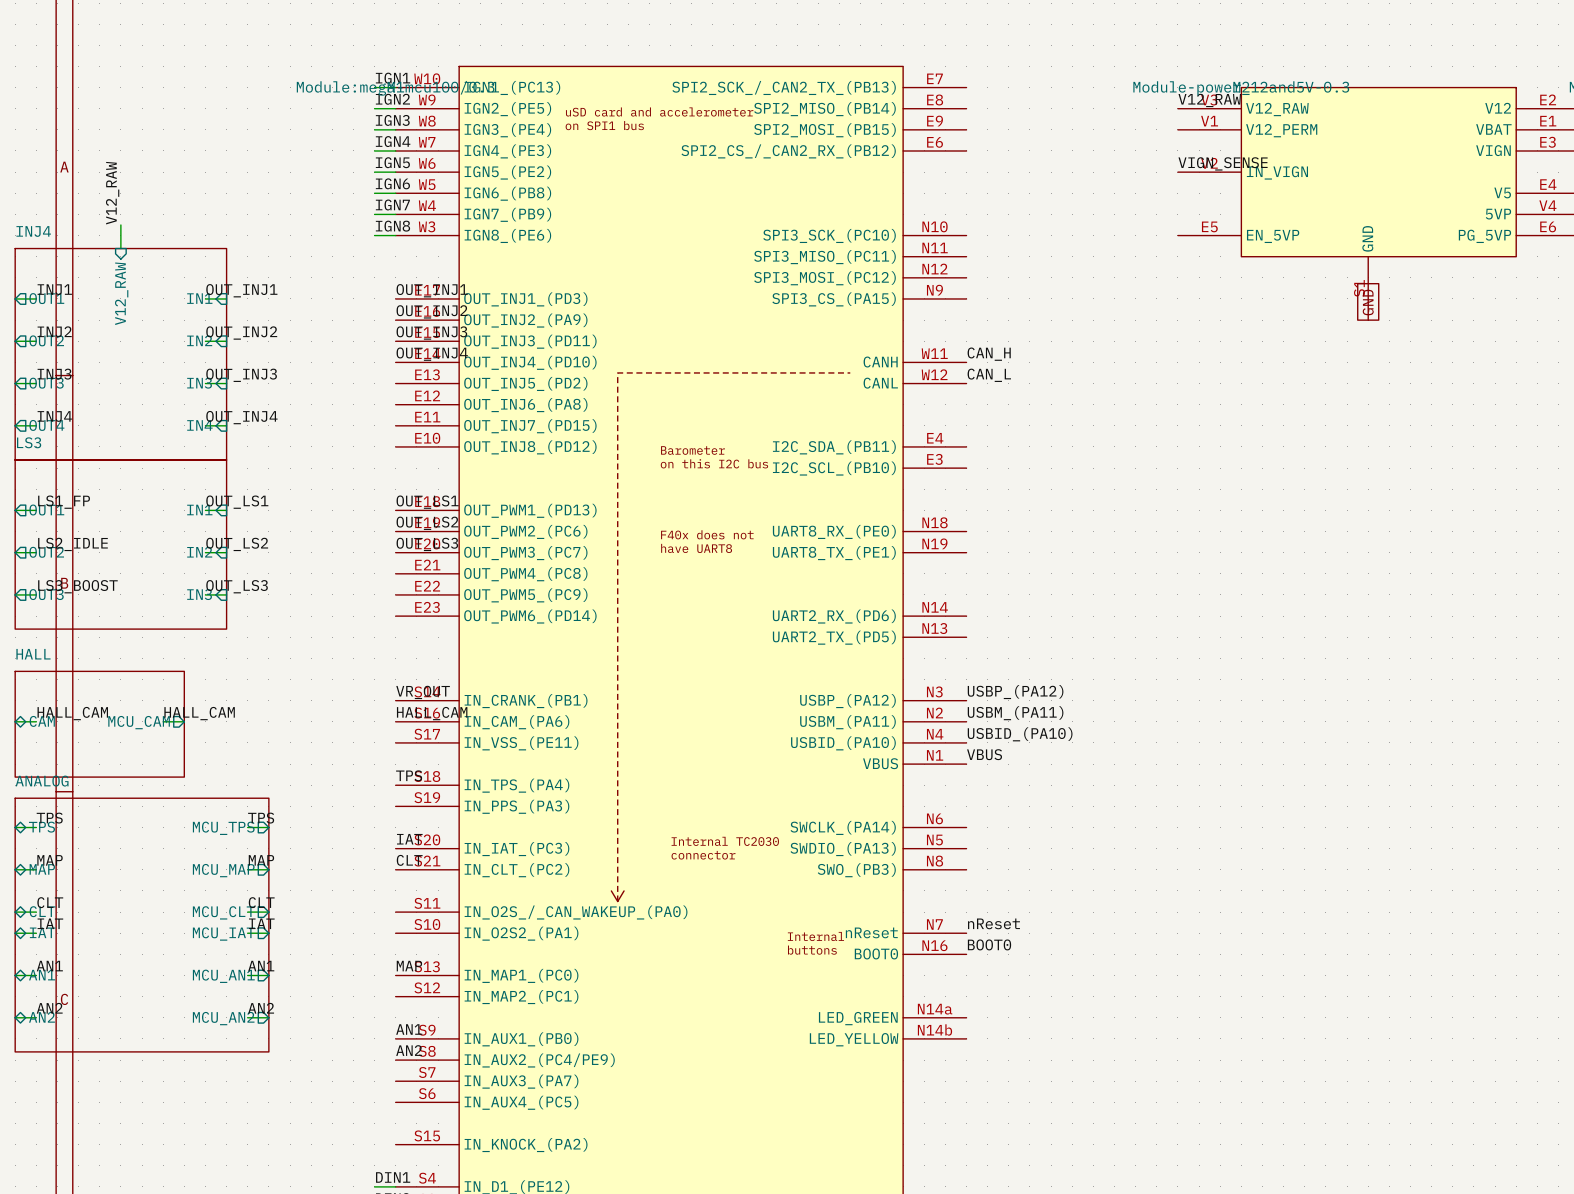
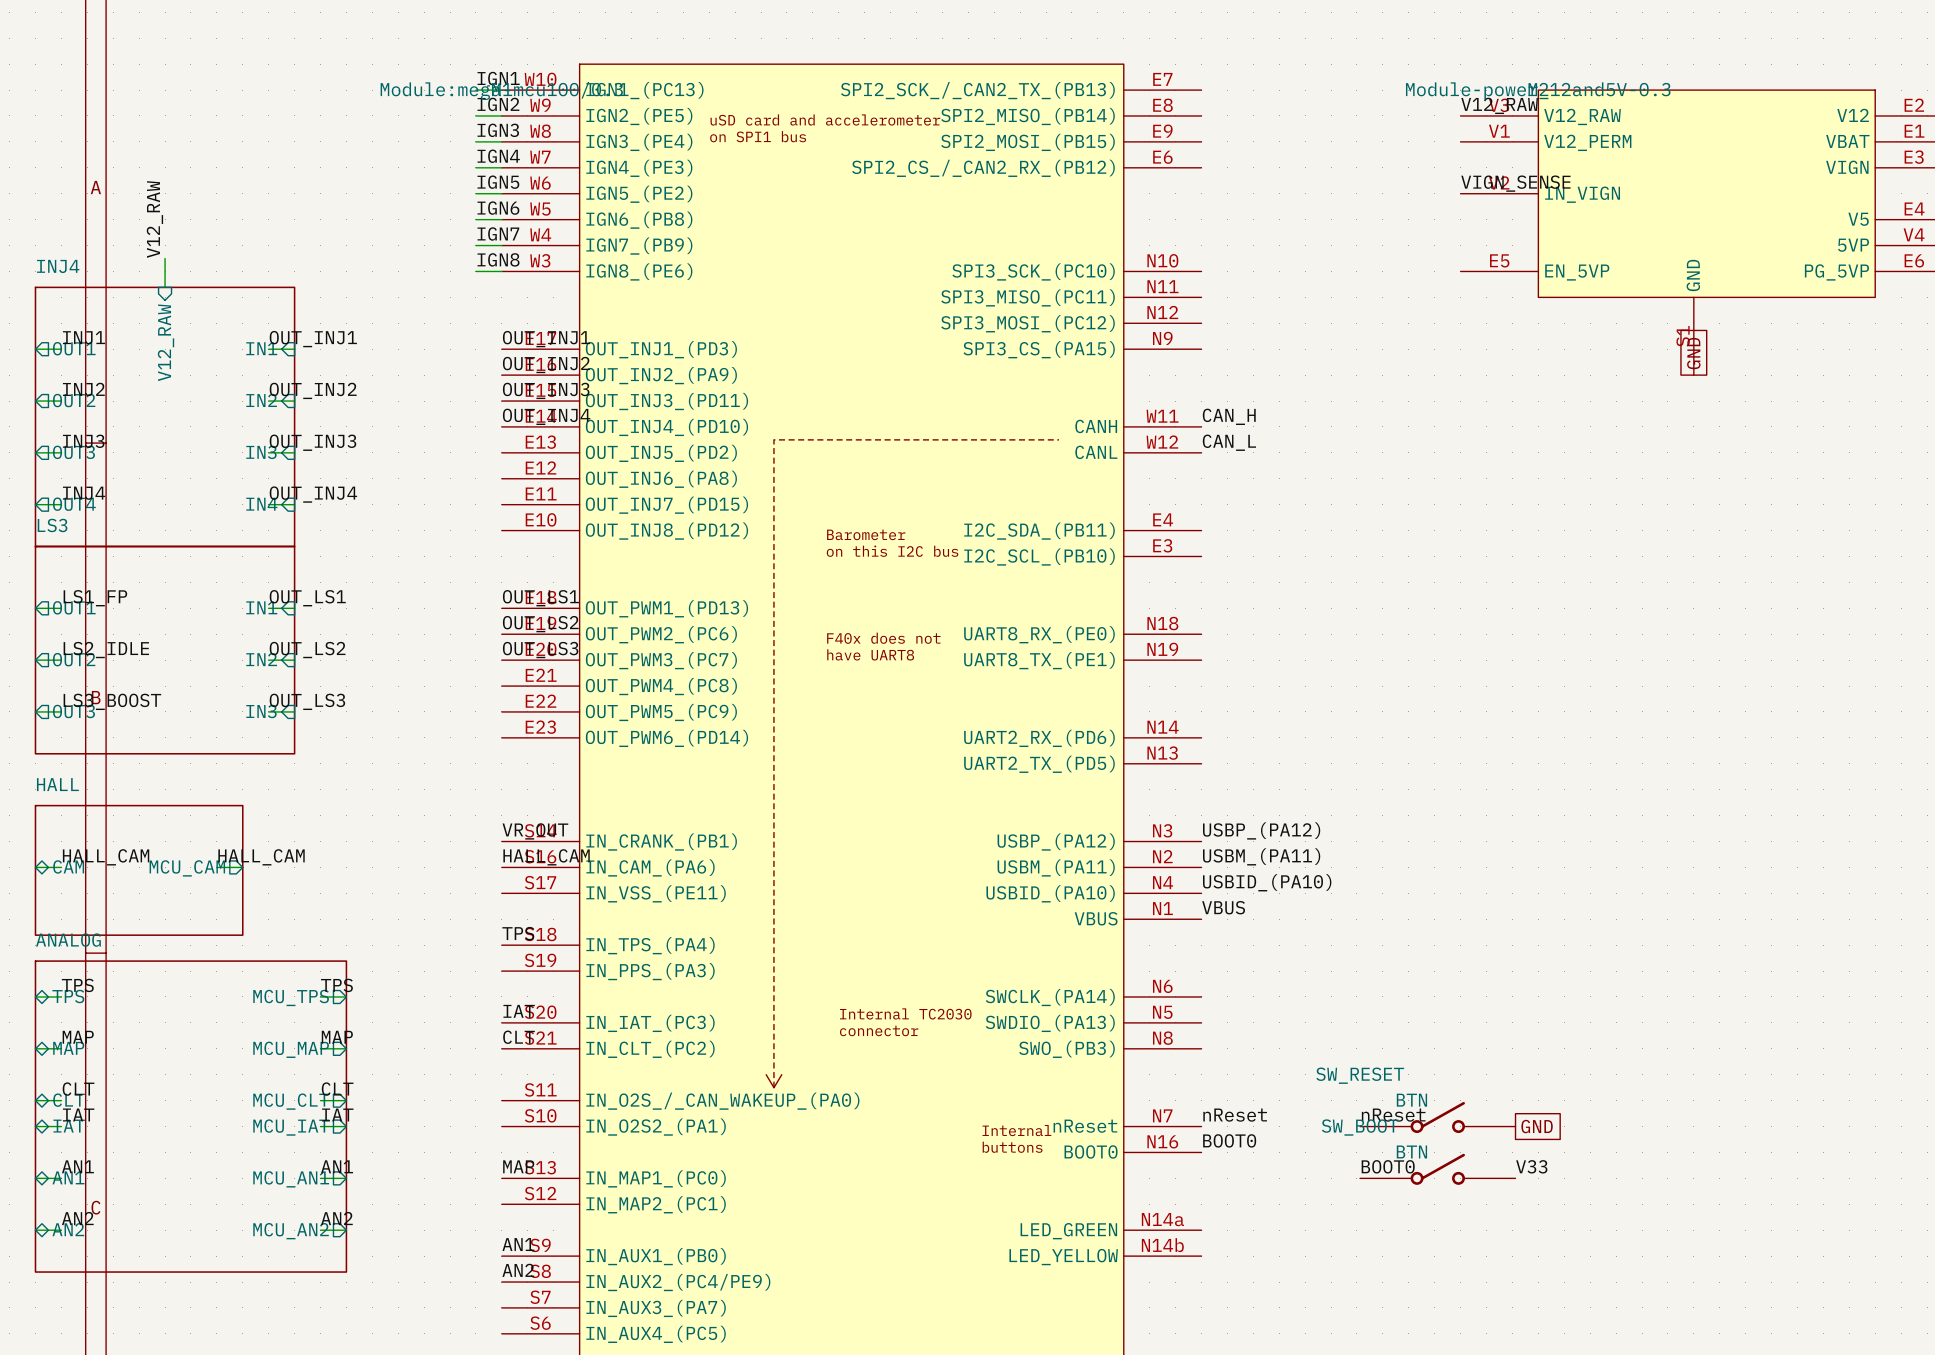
label: none -> nReset (1393, 1115)
SW_RESET: none -> BTN (1437, 1117)
global label: none -> GND (1537, 1126)
label: none -> BOOT0 (1388, 1166)
label: none -> V33 (1531, 1166)
SW_BOOT: none -> BTN (1437, 1169)

